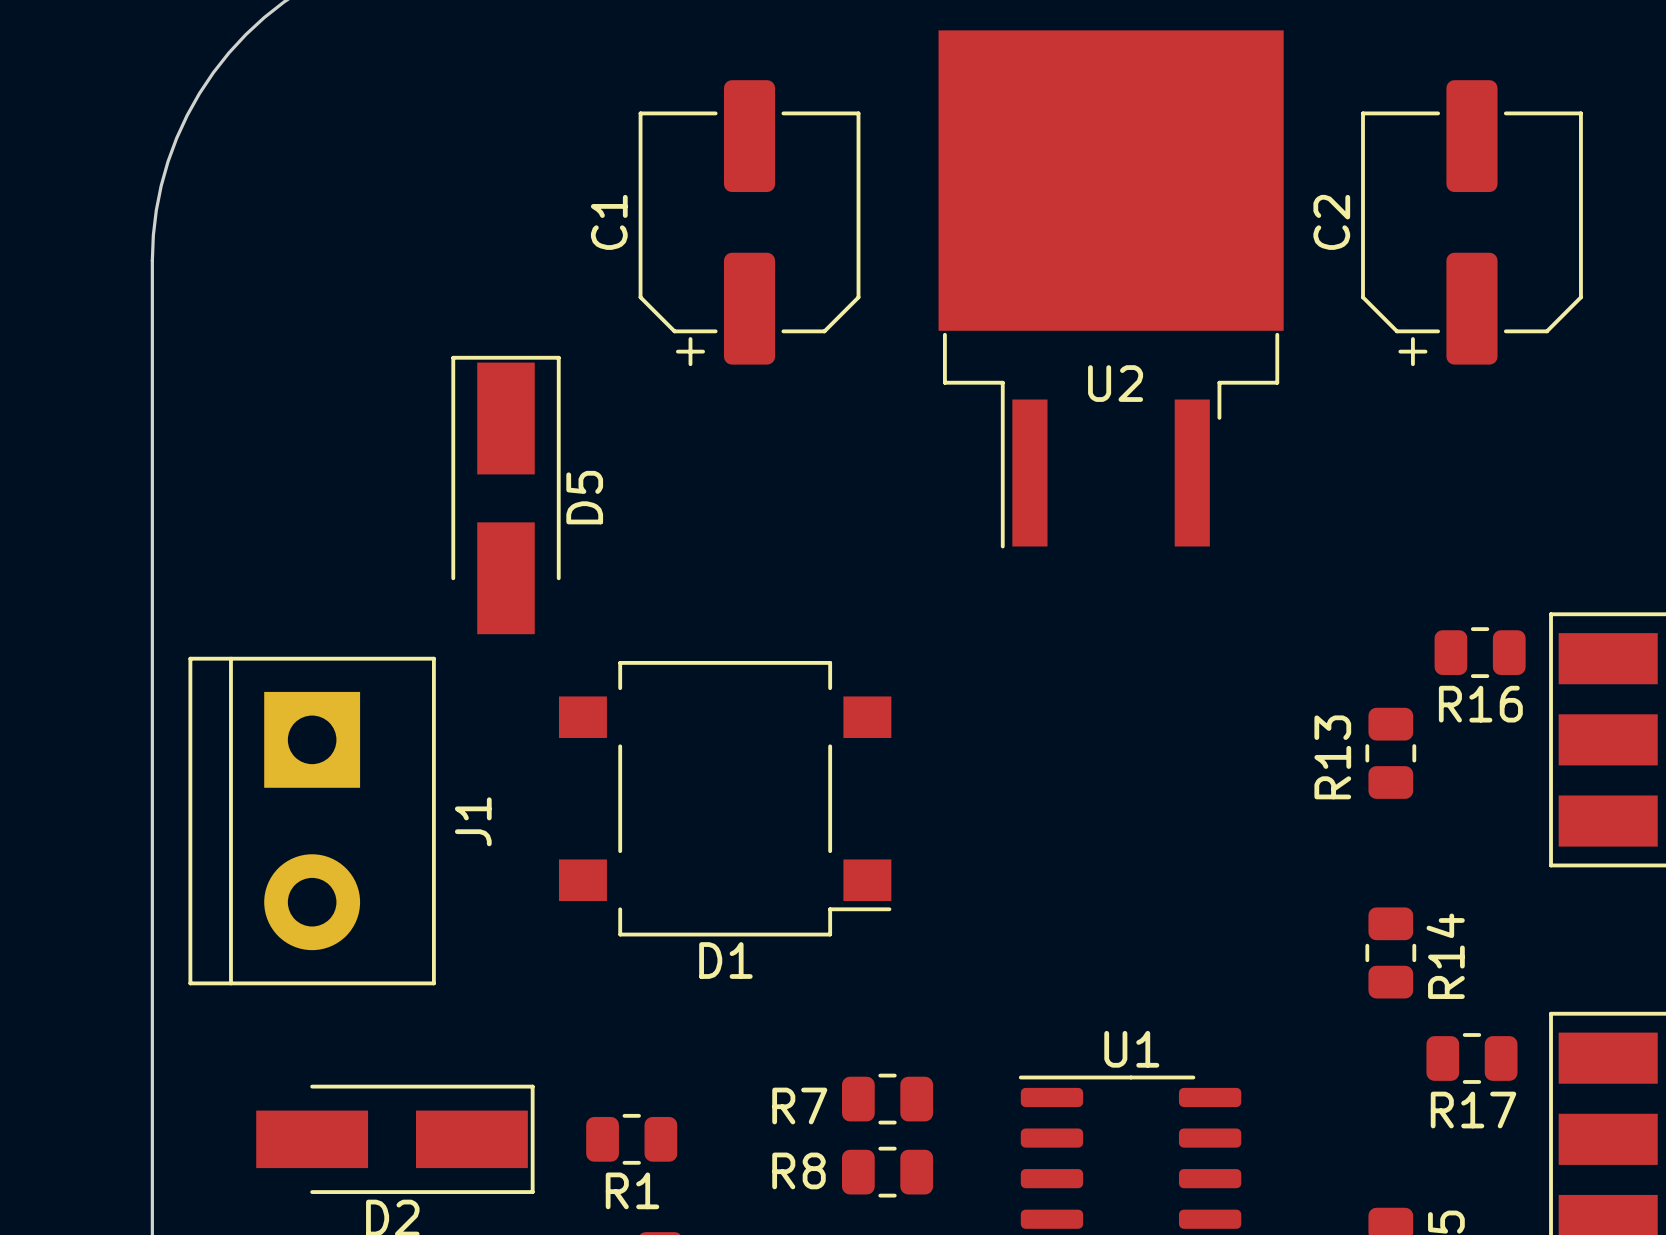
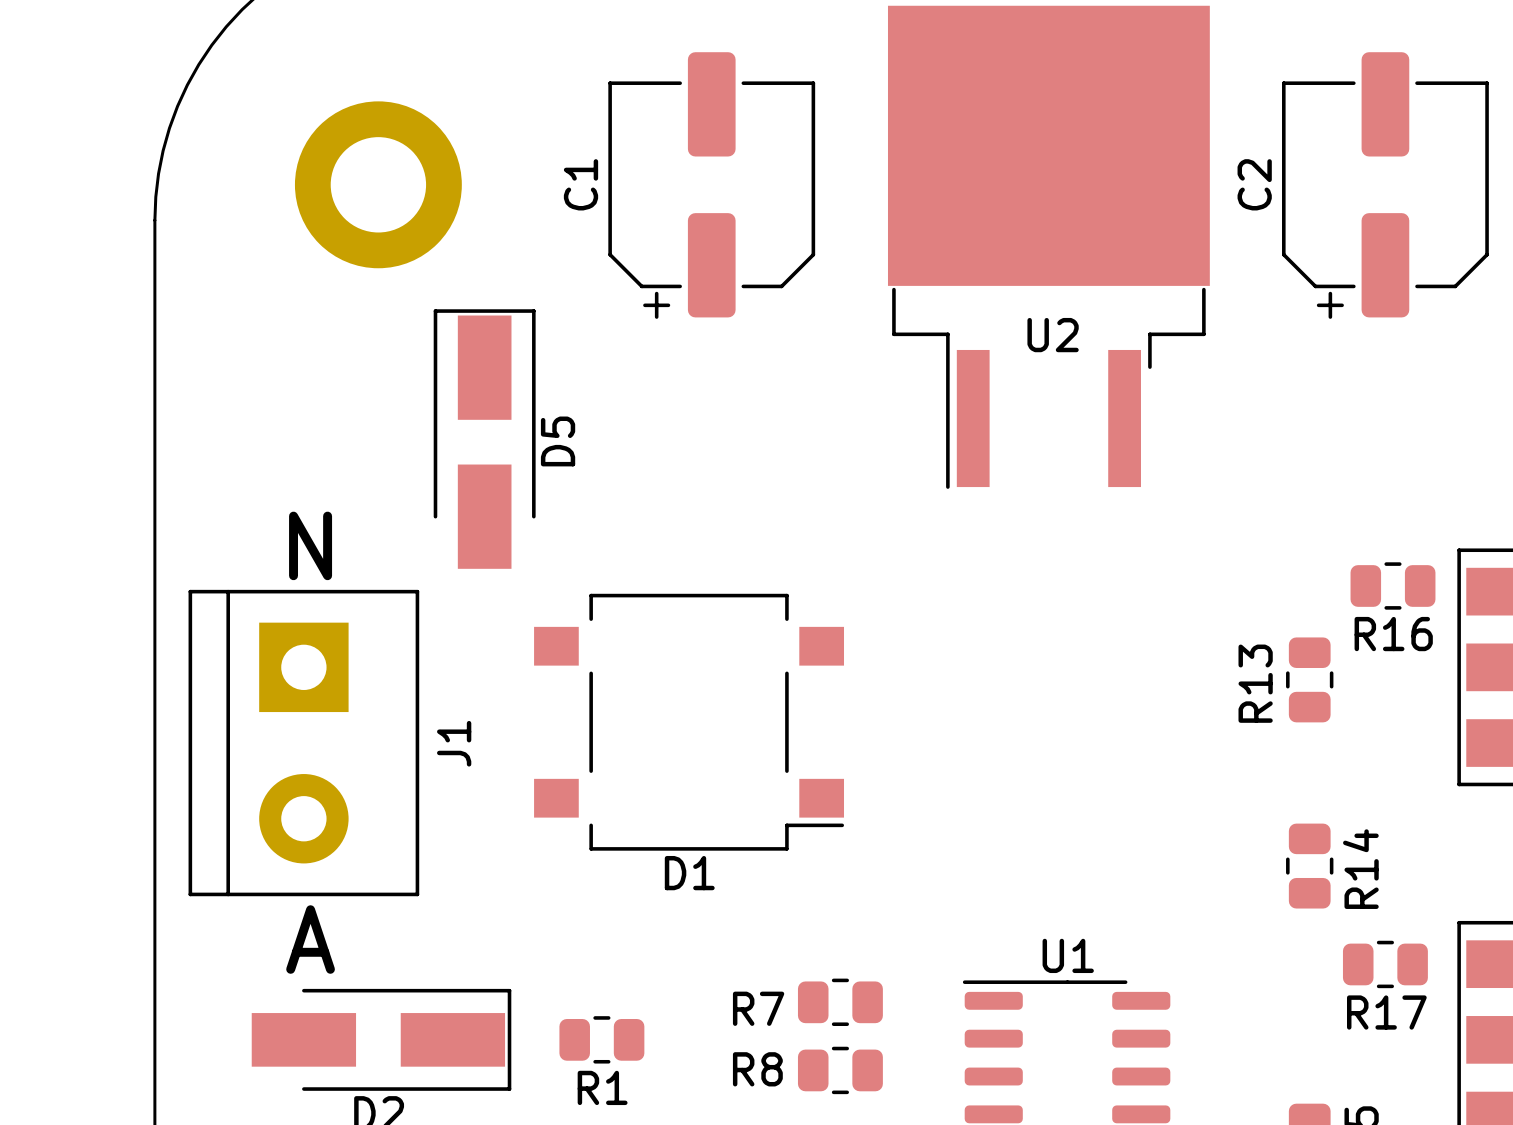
part: none -> (378, 184)
text: none -> N (310, 545)
text: none -> A (310, 939)

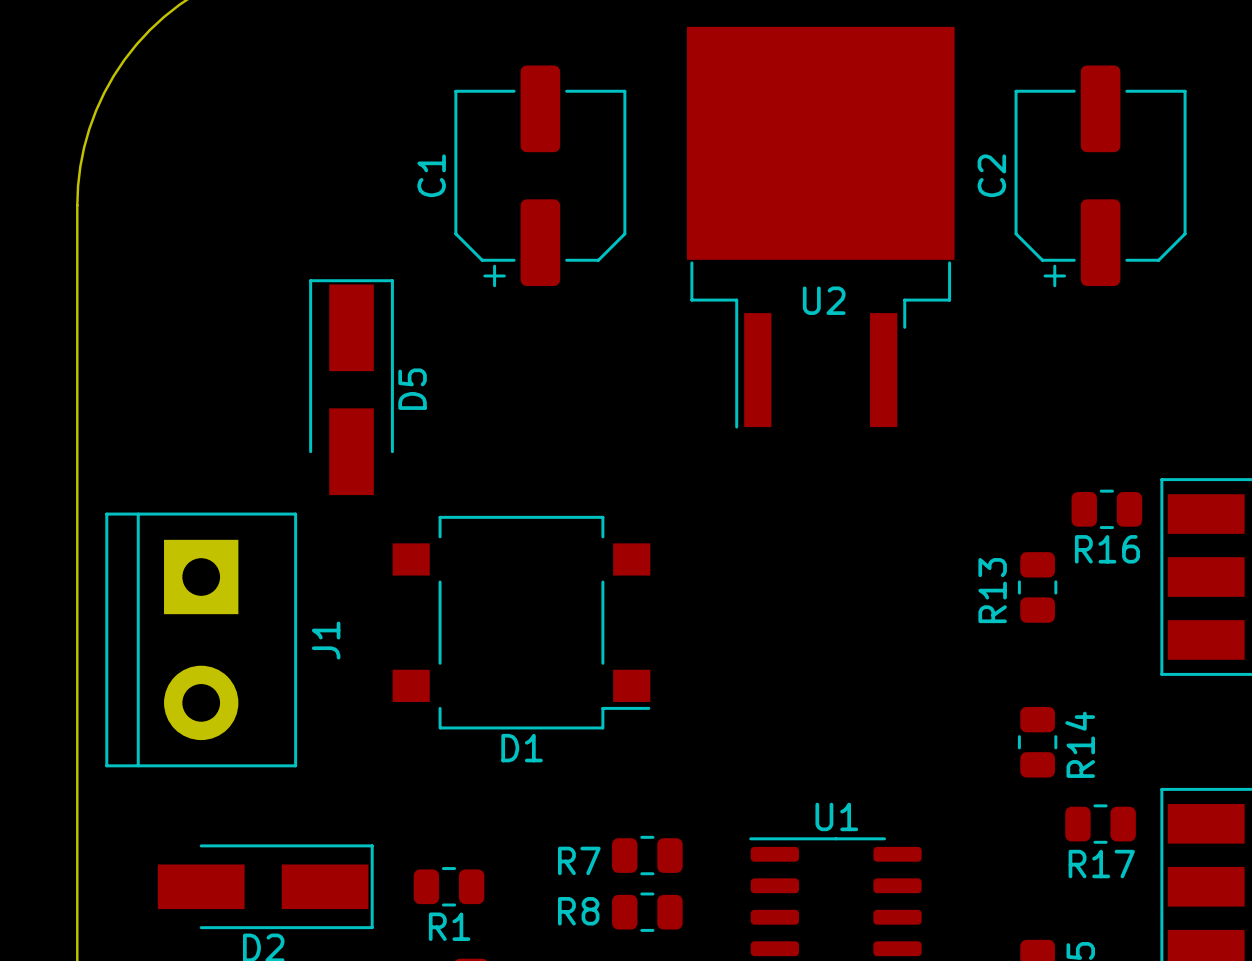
part: (378, 184) -> none
text: N (310, 545) -> none
text: A (310, 939) -> none

